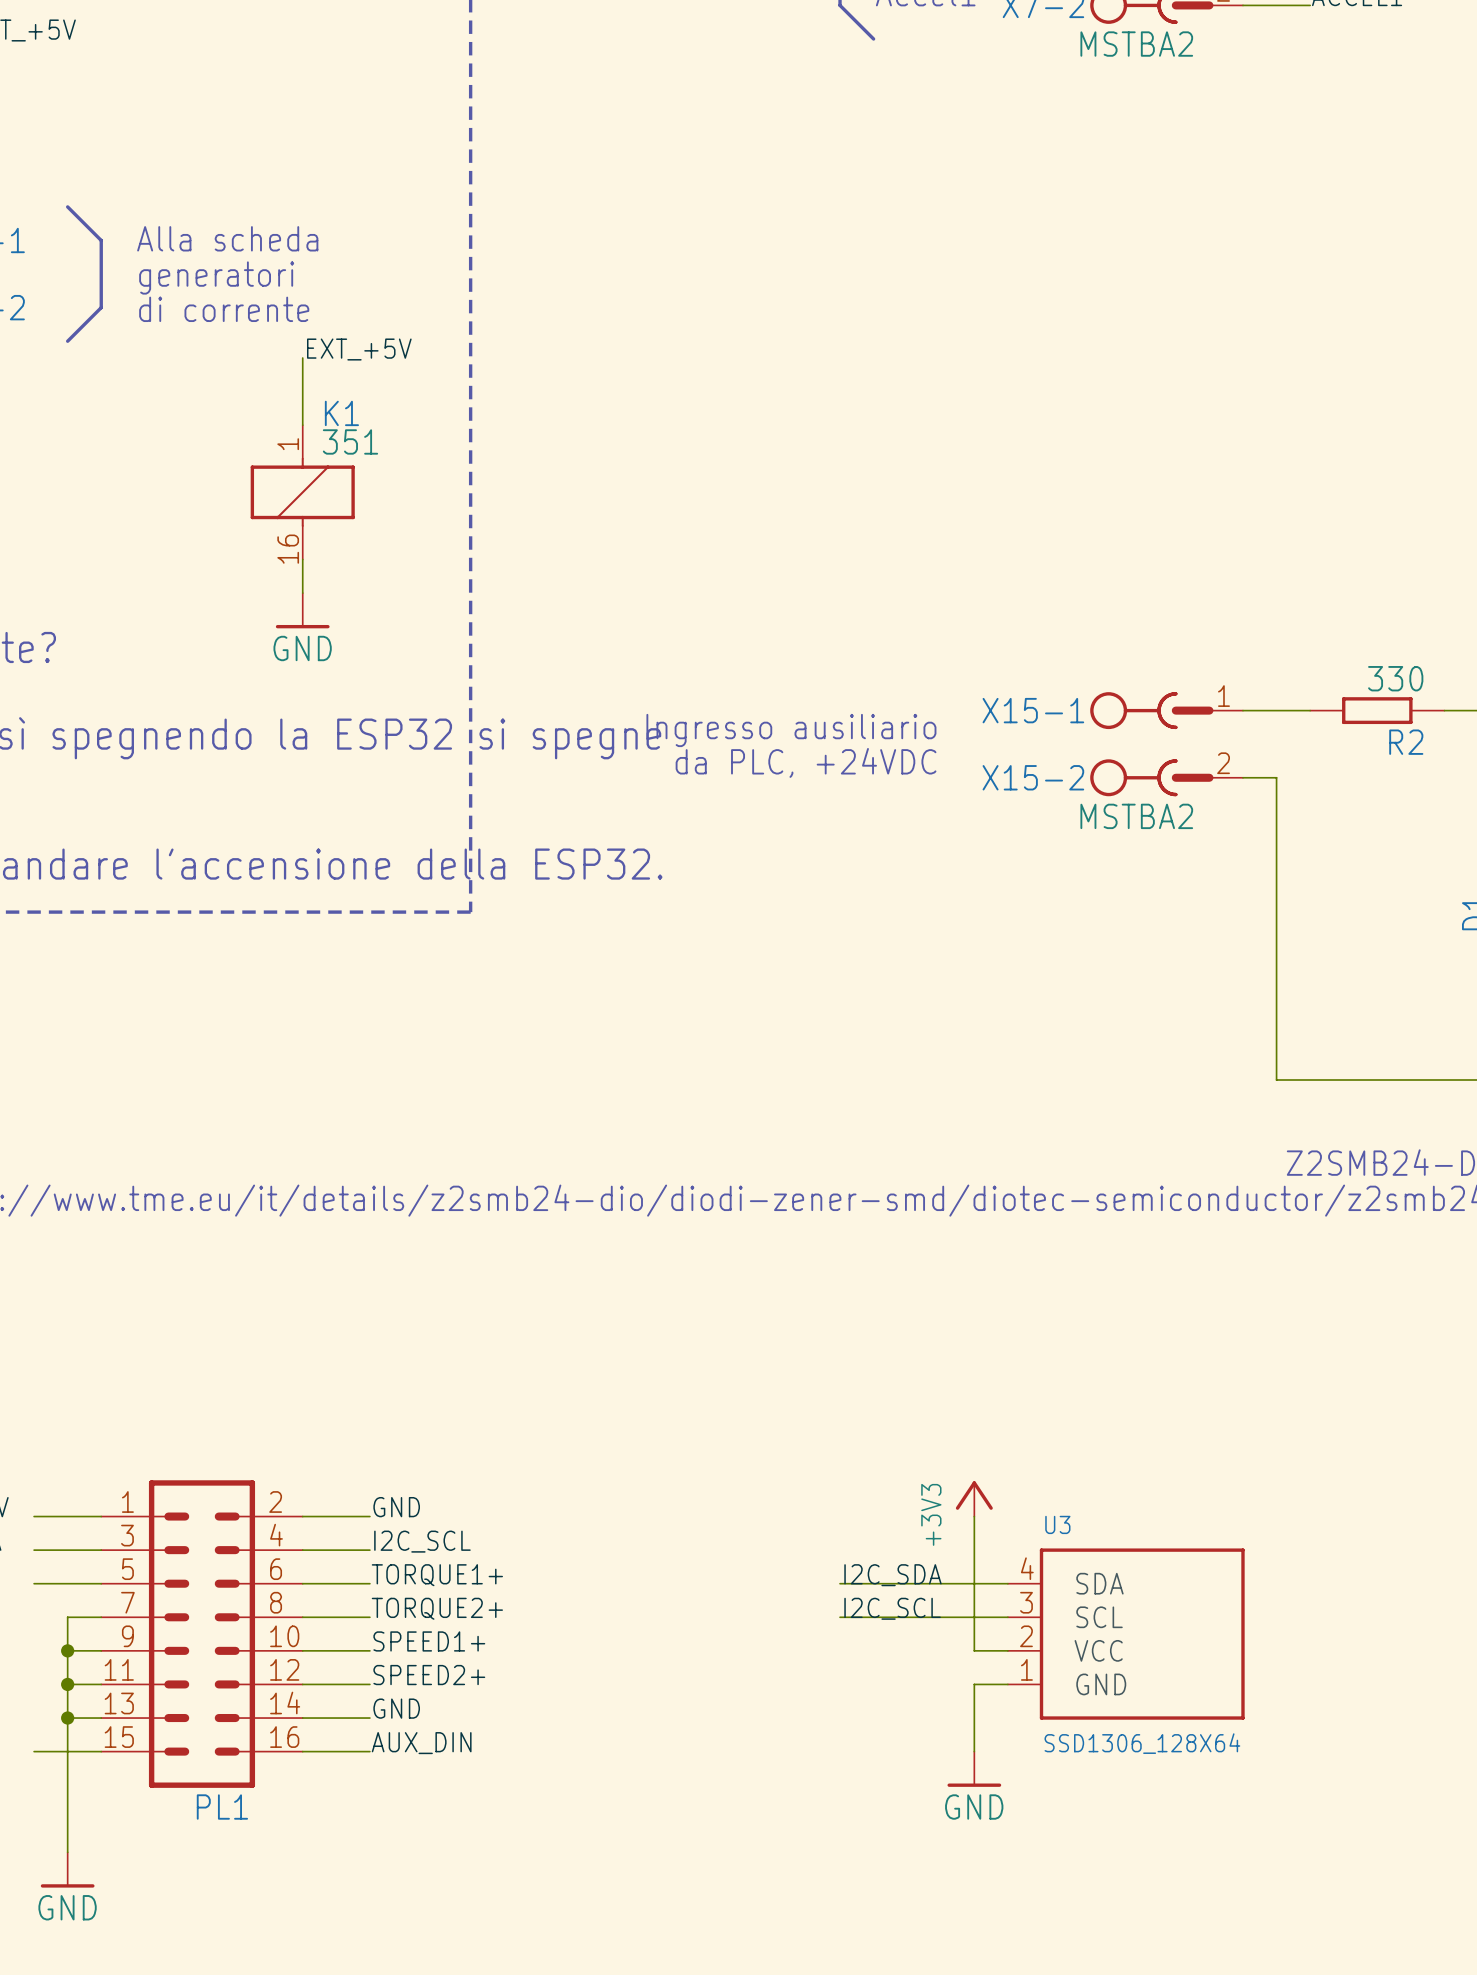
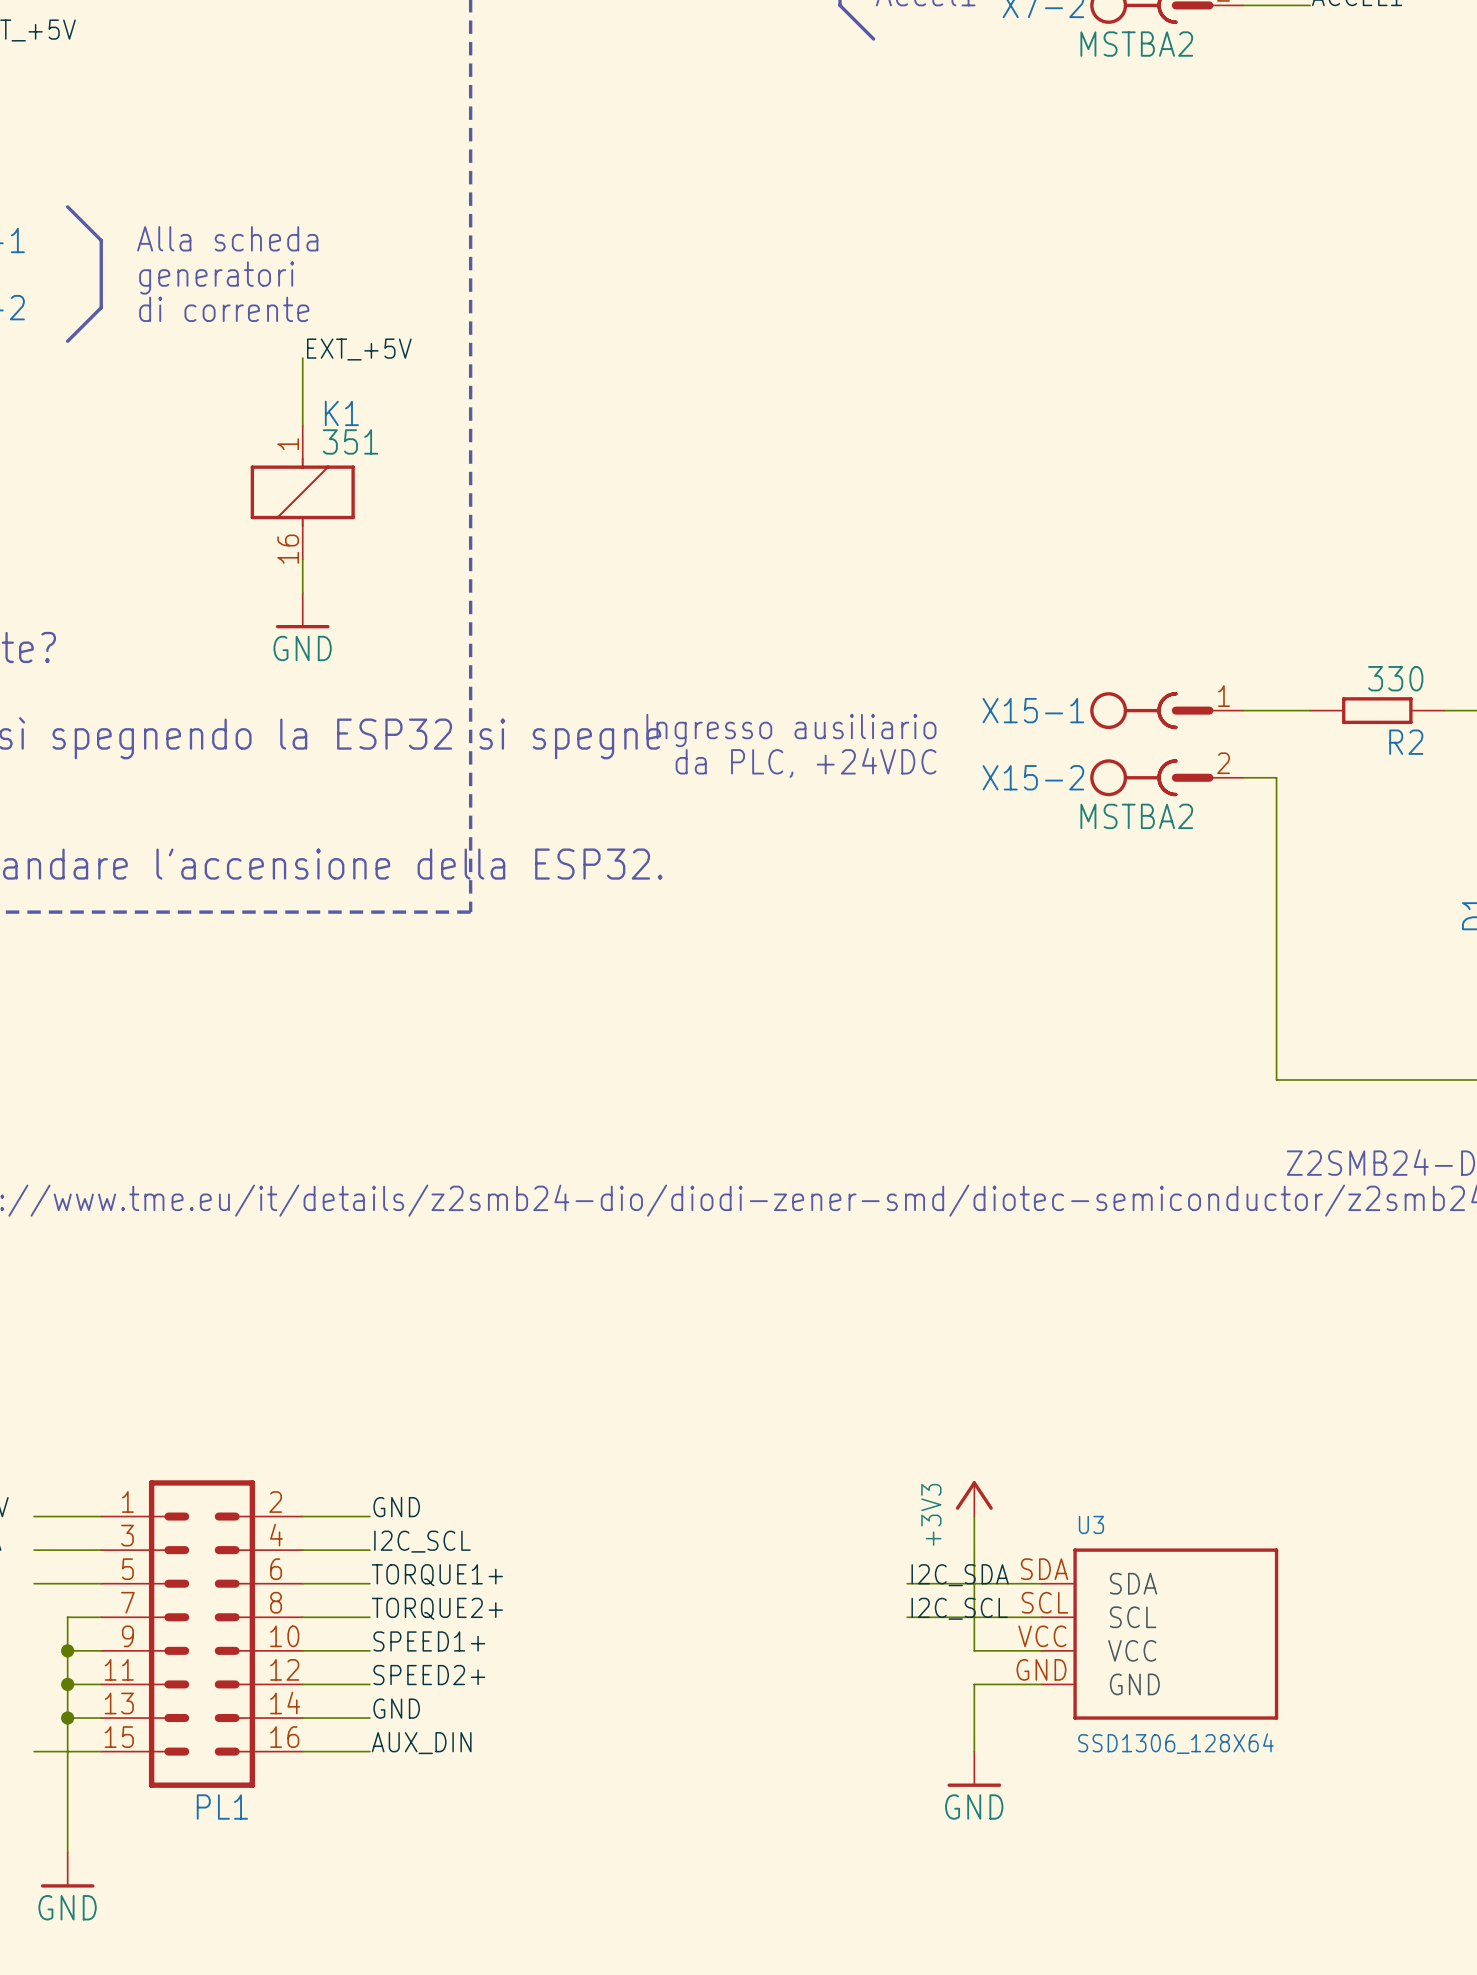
U3 pin number: 4 (1027, 1568) -> SDA (1044, 1569)
label position: I2C_SDA (892, 1575) -> I2C_SDA (960, 1575)
wire: (840, 1583) (907, 1583) -> none
U3 pin number: 3 (1026, 1602) -> SCL (1044, 1602)
label position: I2C_SCL (892, 1608) -> I2C_SCL (959, 1608)
wire: (840, 1617) (907, 1617) -> none
U3 position: (1126, 1634) -> (1159, 1634)
U3 pin number: 2 (1026, 1636) -> VCC (1042, 1636)
U3 pin number: 1 (1026, 1669) -> GND (1041, 1669)

